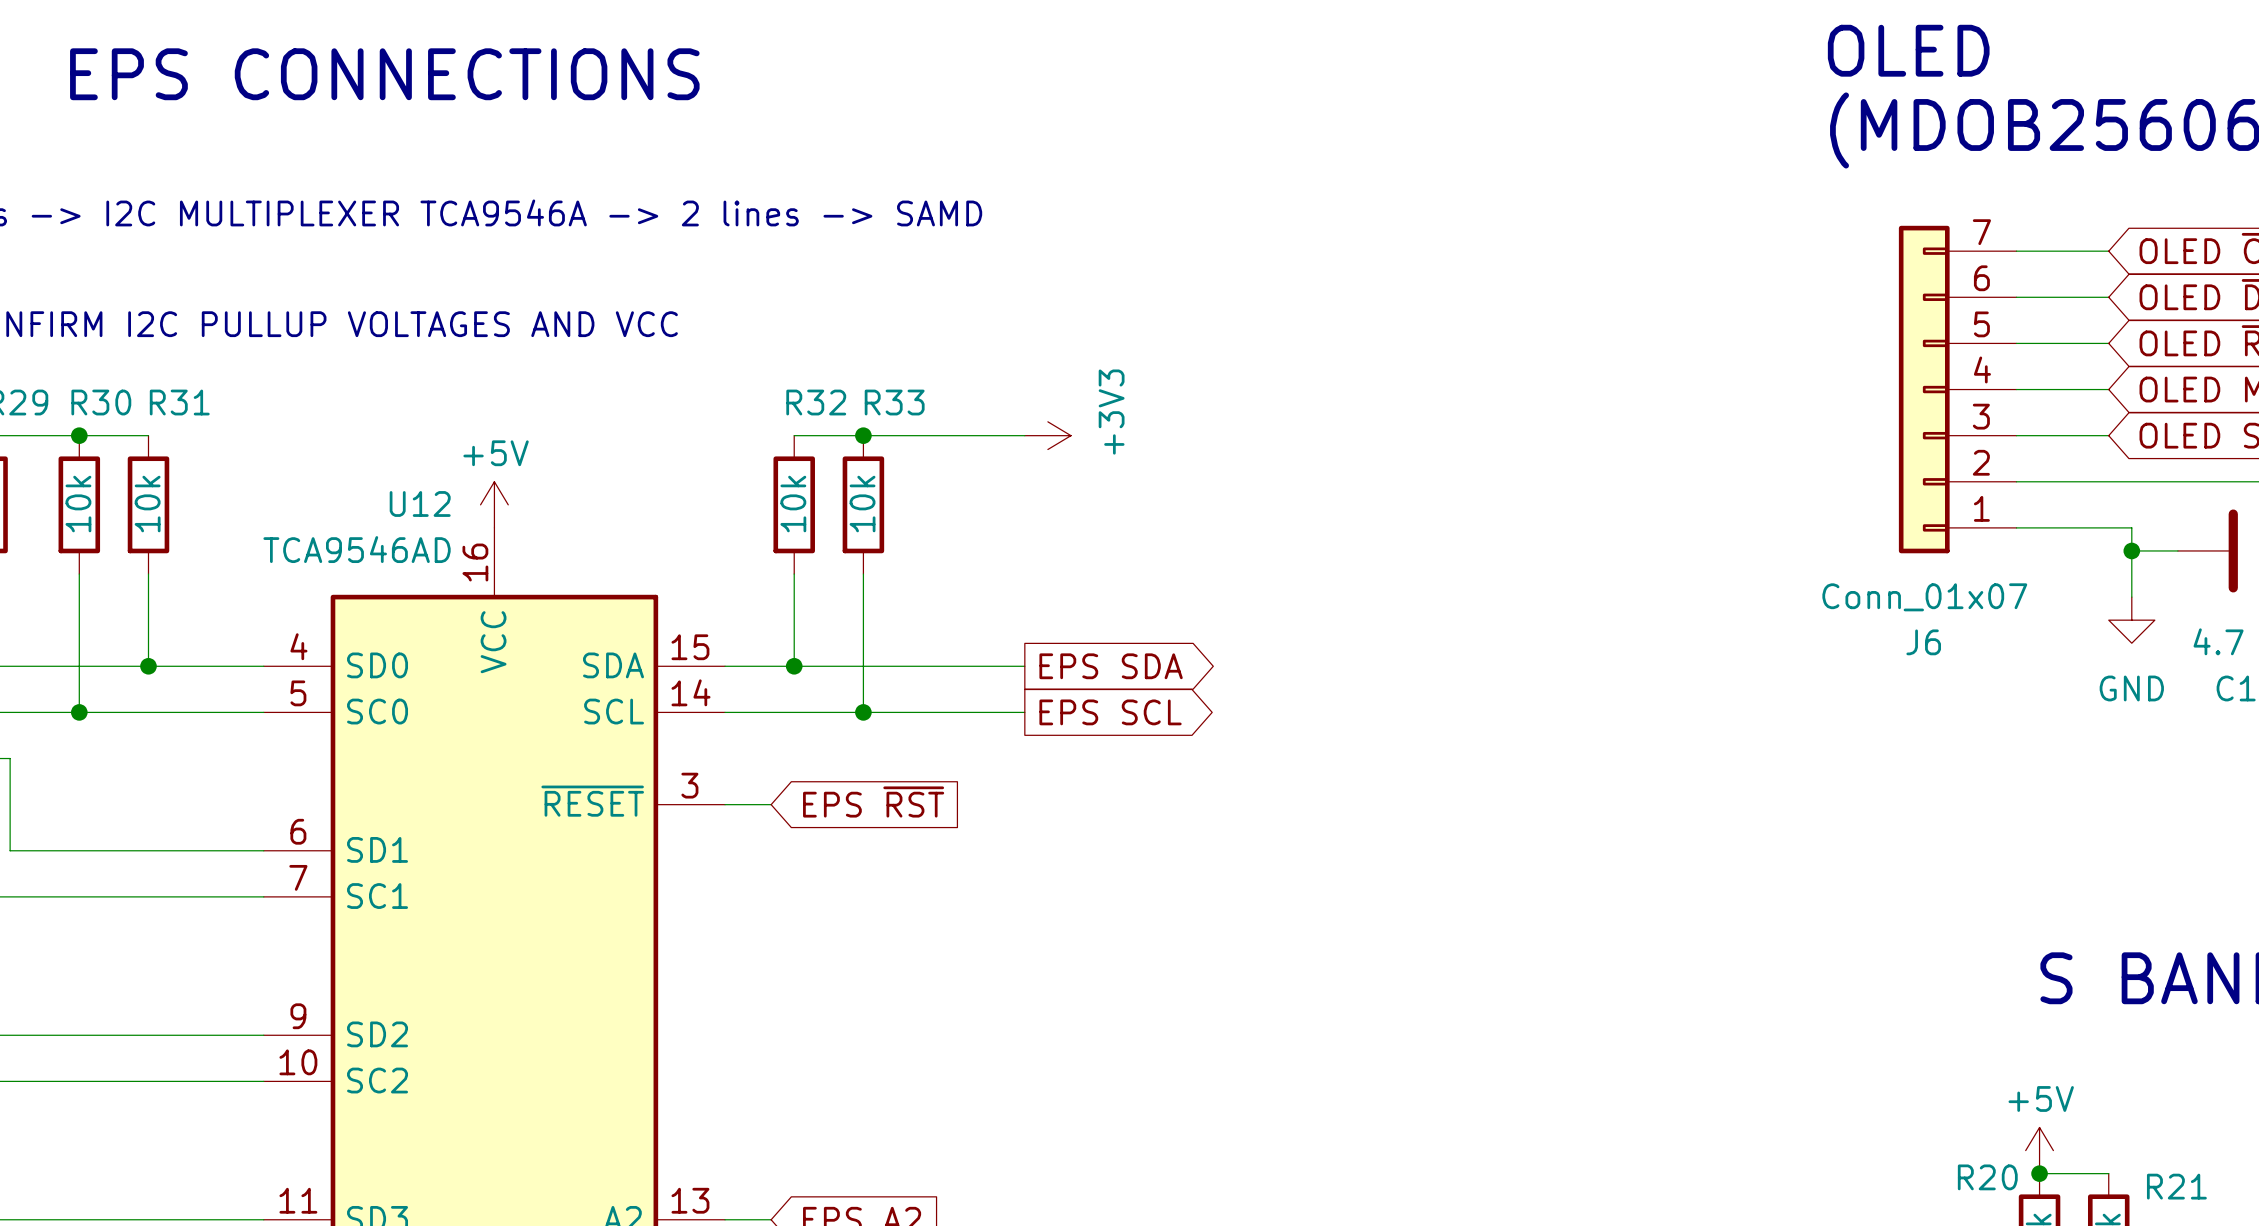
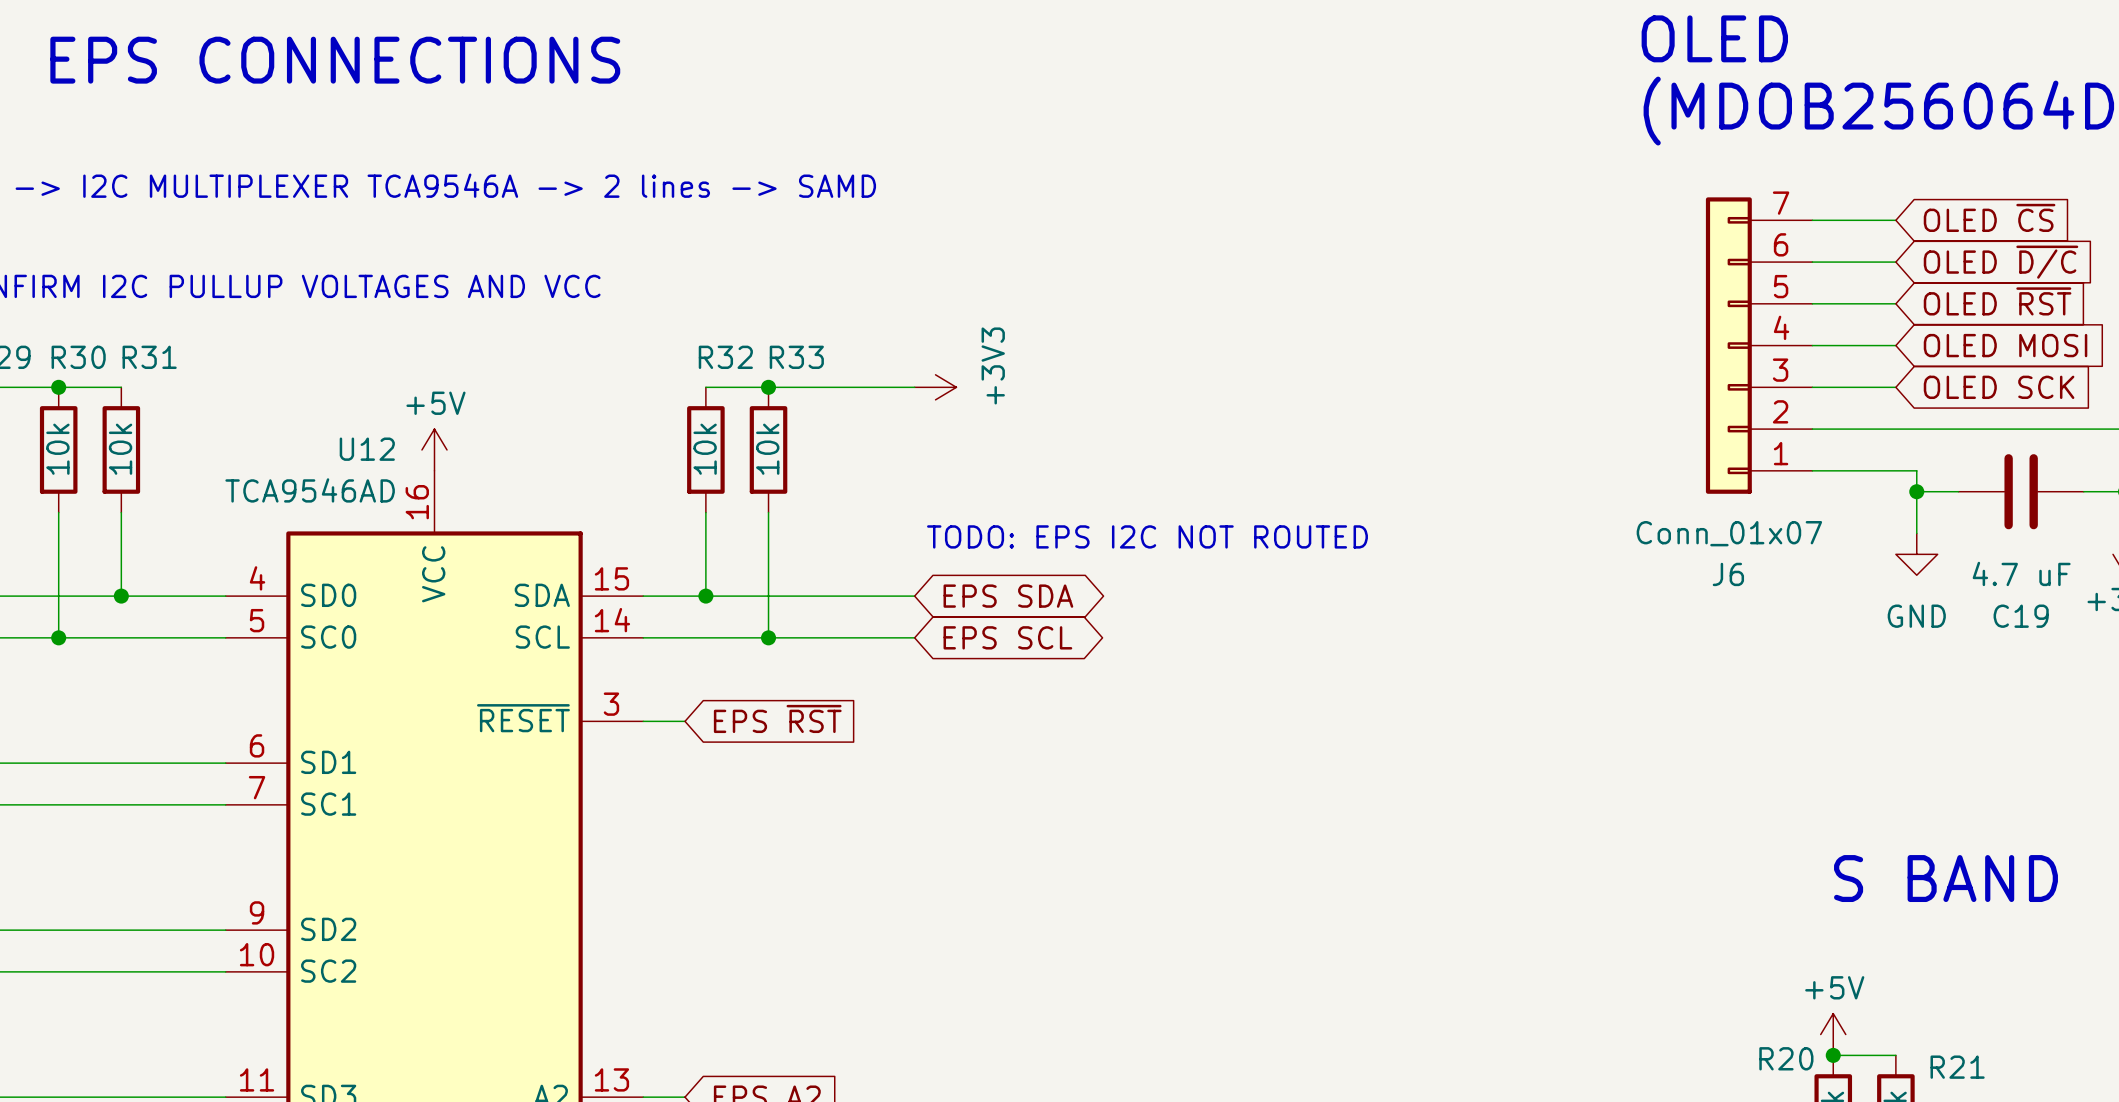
text: none -> TODO: EPS I2C NOT ROUTED (1147, 536)
global label shape: output (1111, 666) -> bidirectional (1008, 596)
global label shape: output (1110, 712) -> bidirectional (1007, 637)

